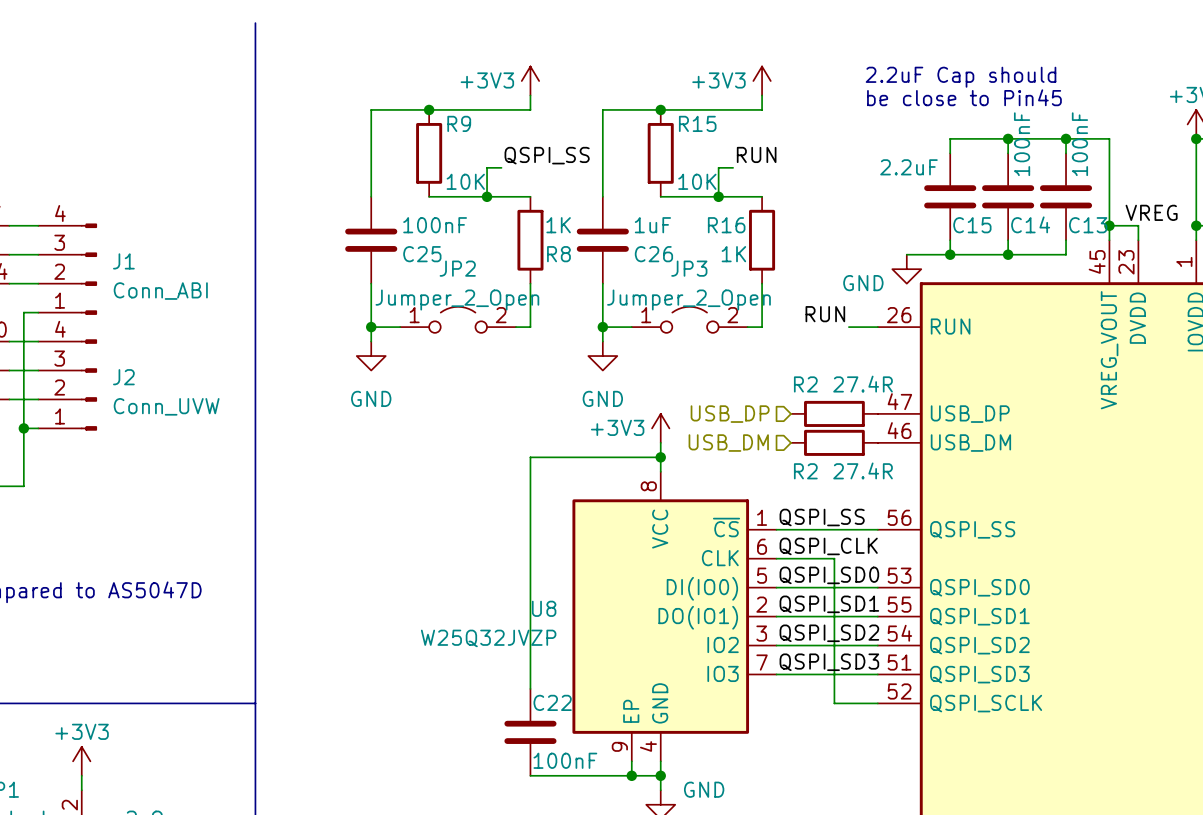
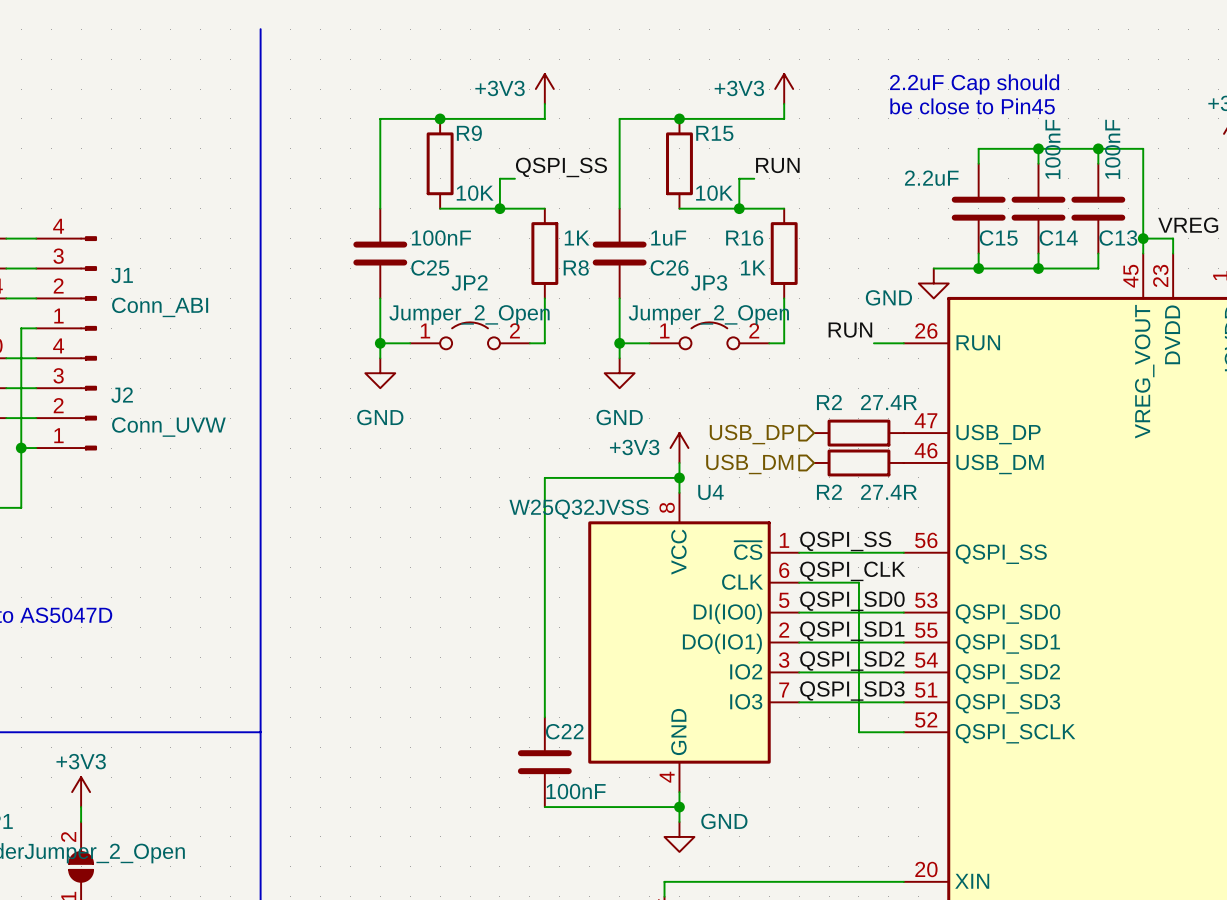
U8: W25Q32JVZP (674, 616) -> none
U4: none -> W25Q32JVSS (693, 642)
wire: (631, 761) (631, 775) -> none
junction: (631, 775) -> none

